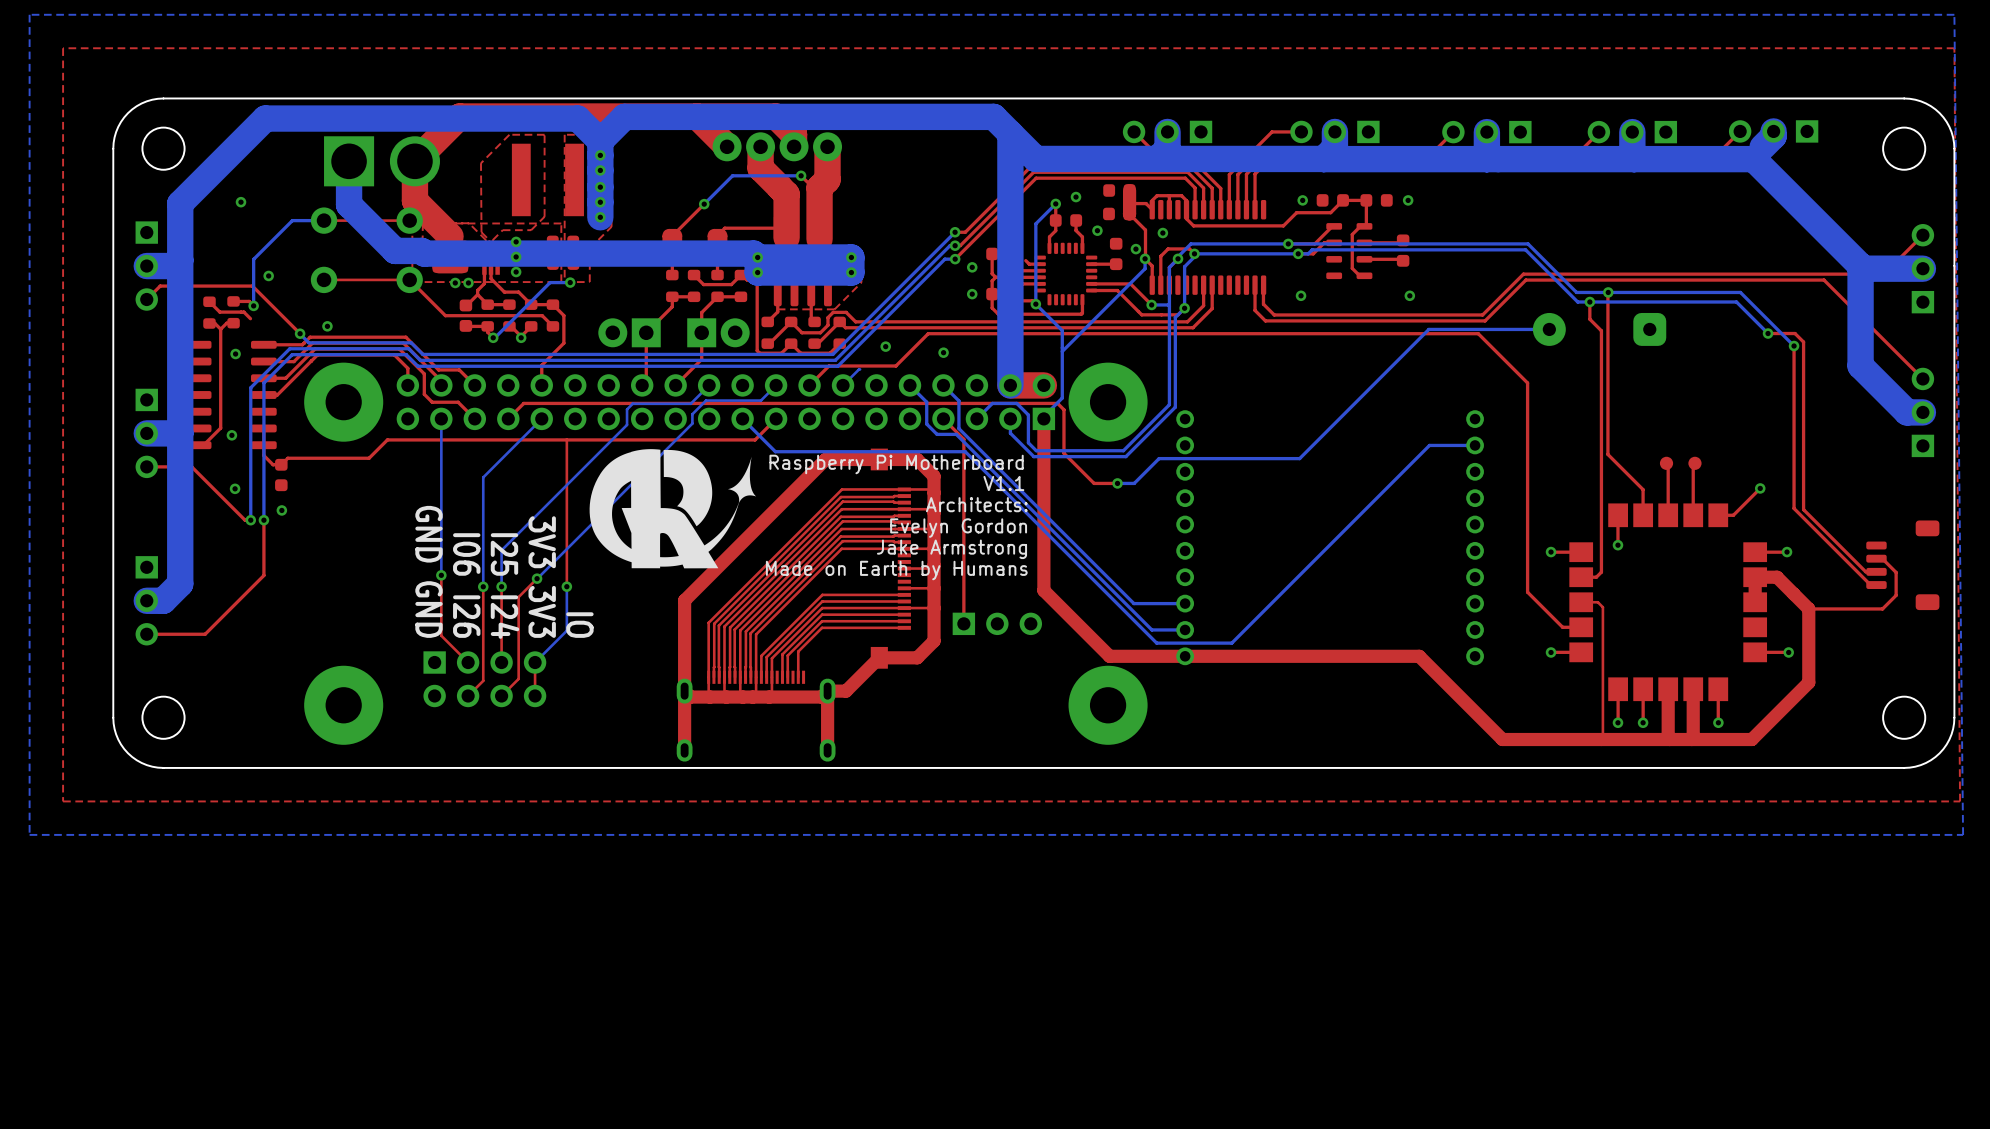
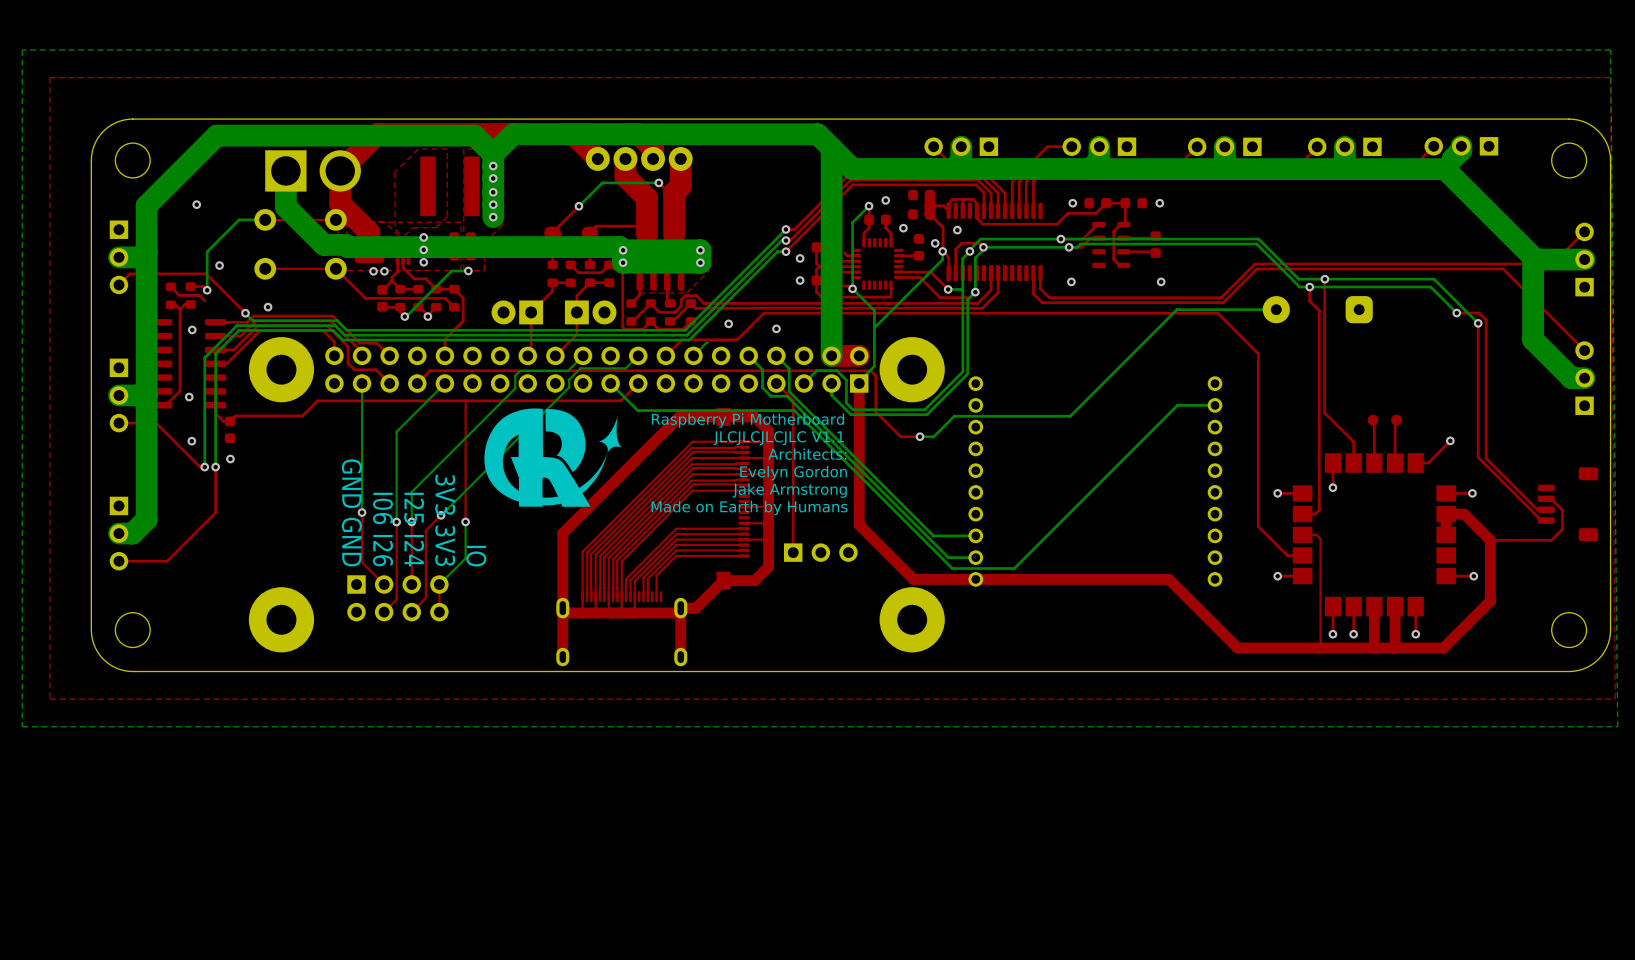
text: V1.1 (1003, 483) -> JLCJLCJLCJLC V1.1 (778, 438)

